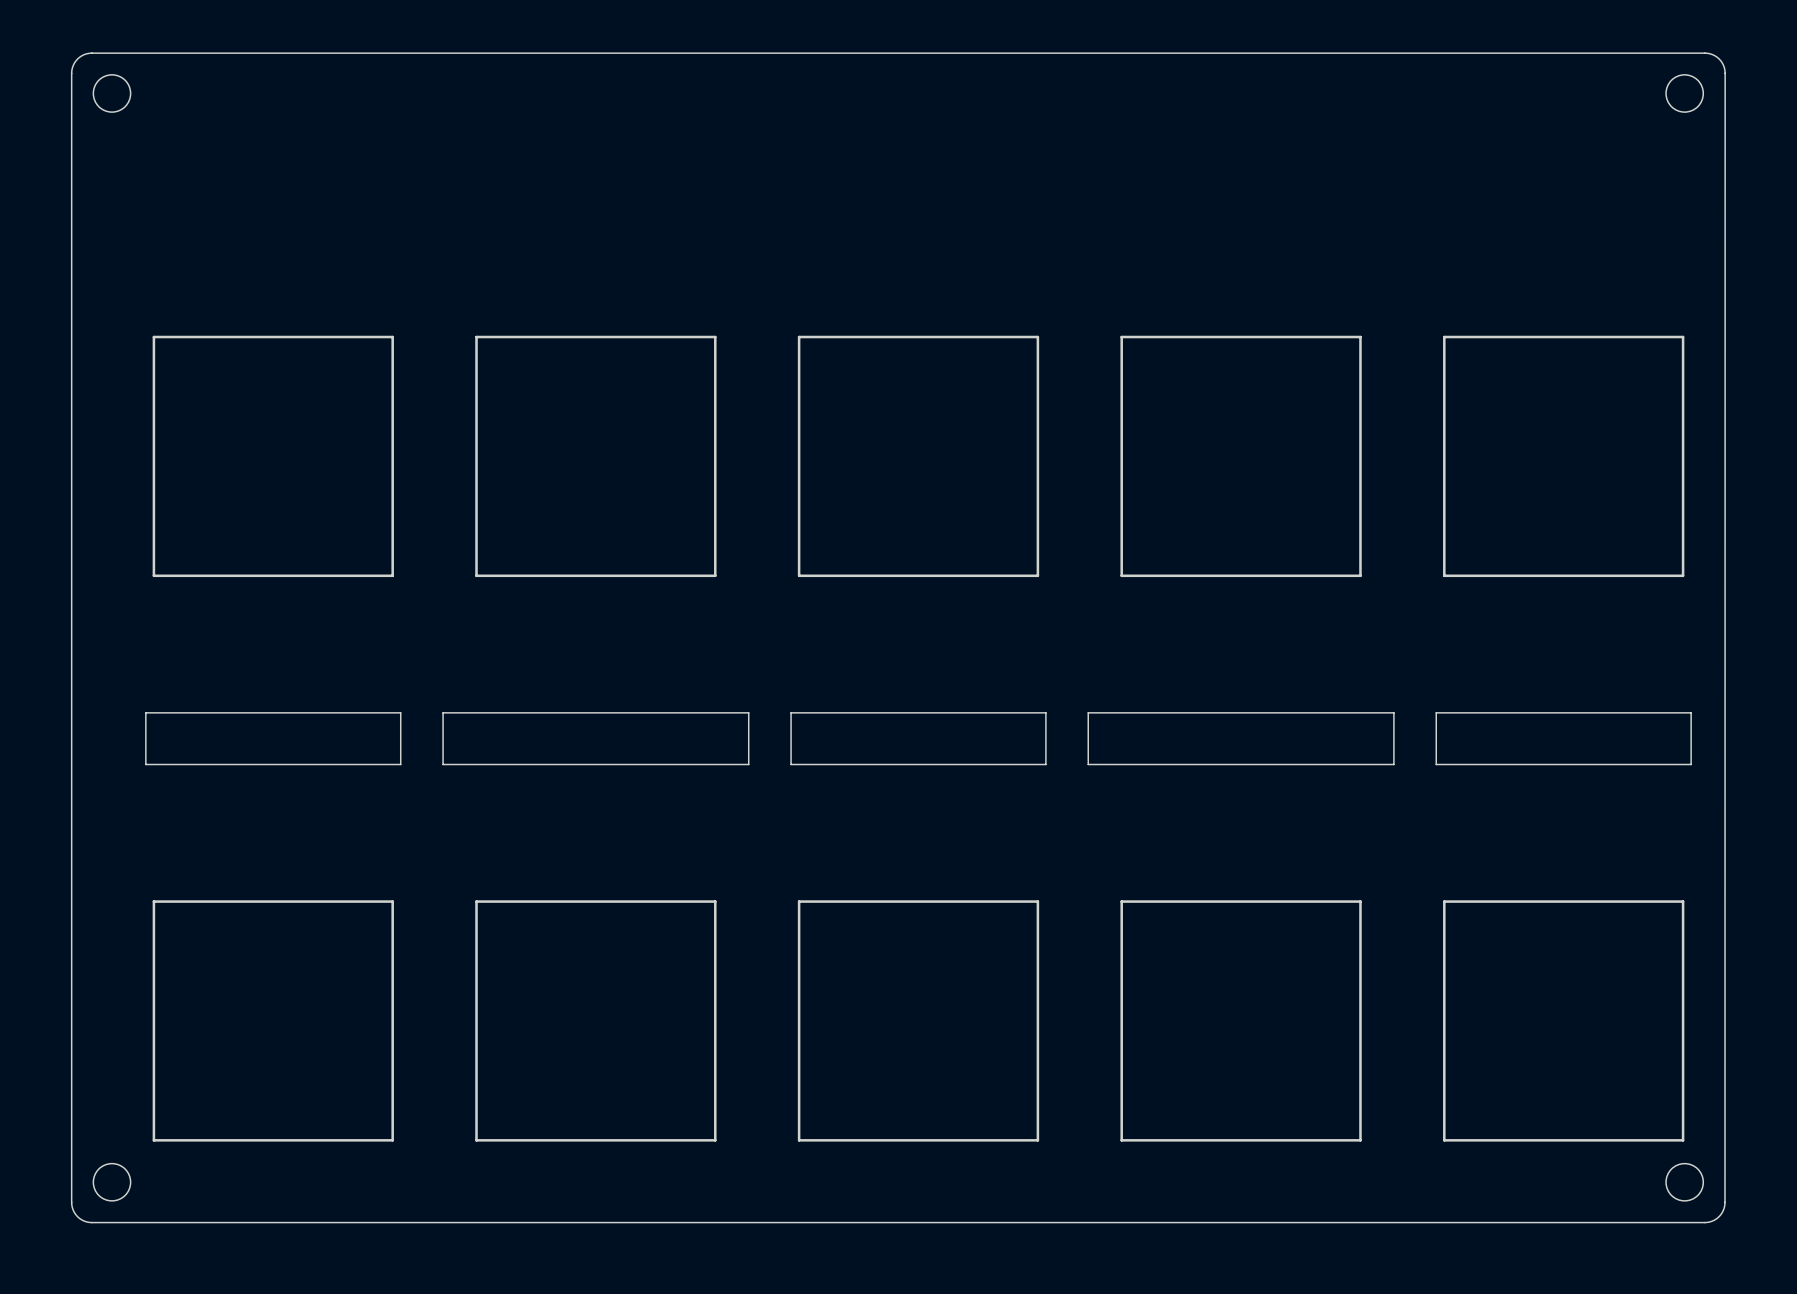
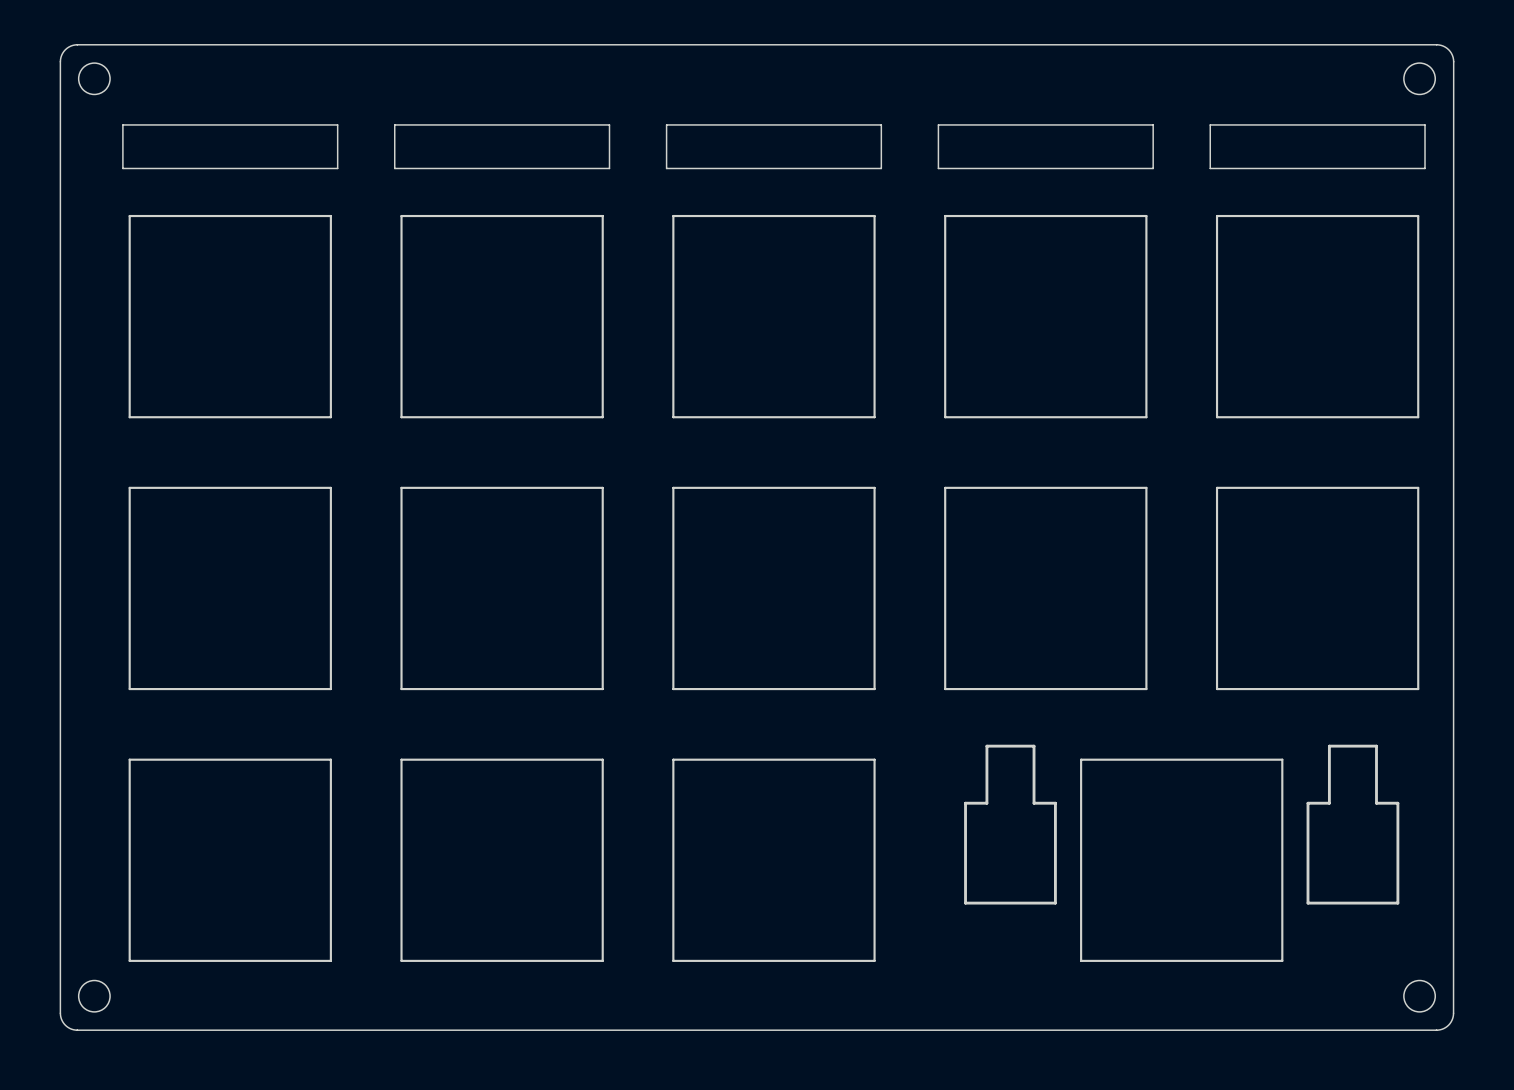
drawing: none -> [122, 124, 339, 169]
drawing: none -> [394, 124, 610, 169]
drawing: none -> [666, 124, 882, 169]
drawing: none -> [938, 124, 1154, 169]
drawing: none -> [1209, 124, 1426, 169]
drawing position: (273, 456) -> (230, 316)
drawing position: (595, 456) -> (502, 316)
drawing position: (918, 456) -> (773, 316)
drawing position: (1241, 456) -> (1045, 316)
drawing position: (1563, 456) -> (1317, 316)
drawing: none -> [128, 486, 332, 691]
drawing: none -> [400, 486, 604, 691]
drawing: none -> [672, 486, 876, 691]
drawing: none -> [944, 486, 1148, 691]
drawing: none -> [1215, 486, 1420, 691]
drawing: [145, 712, 402, 765] -> none
drawing: [442, 712, 750, 765] -> none
drawing: [790, 712, 1047, 765] -> none
drawing: [1087, 712, 1395, 765] -> none
drawing: [1435, 712, 1692, 765] -> none
drawing: none -> [964, 744, 1400, 962]
drawing: [1120, 900, 1362, 1142] -> none
drawing: [1443, 900, 1685, 1142] -> none

